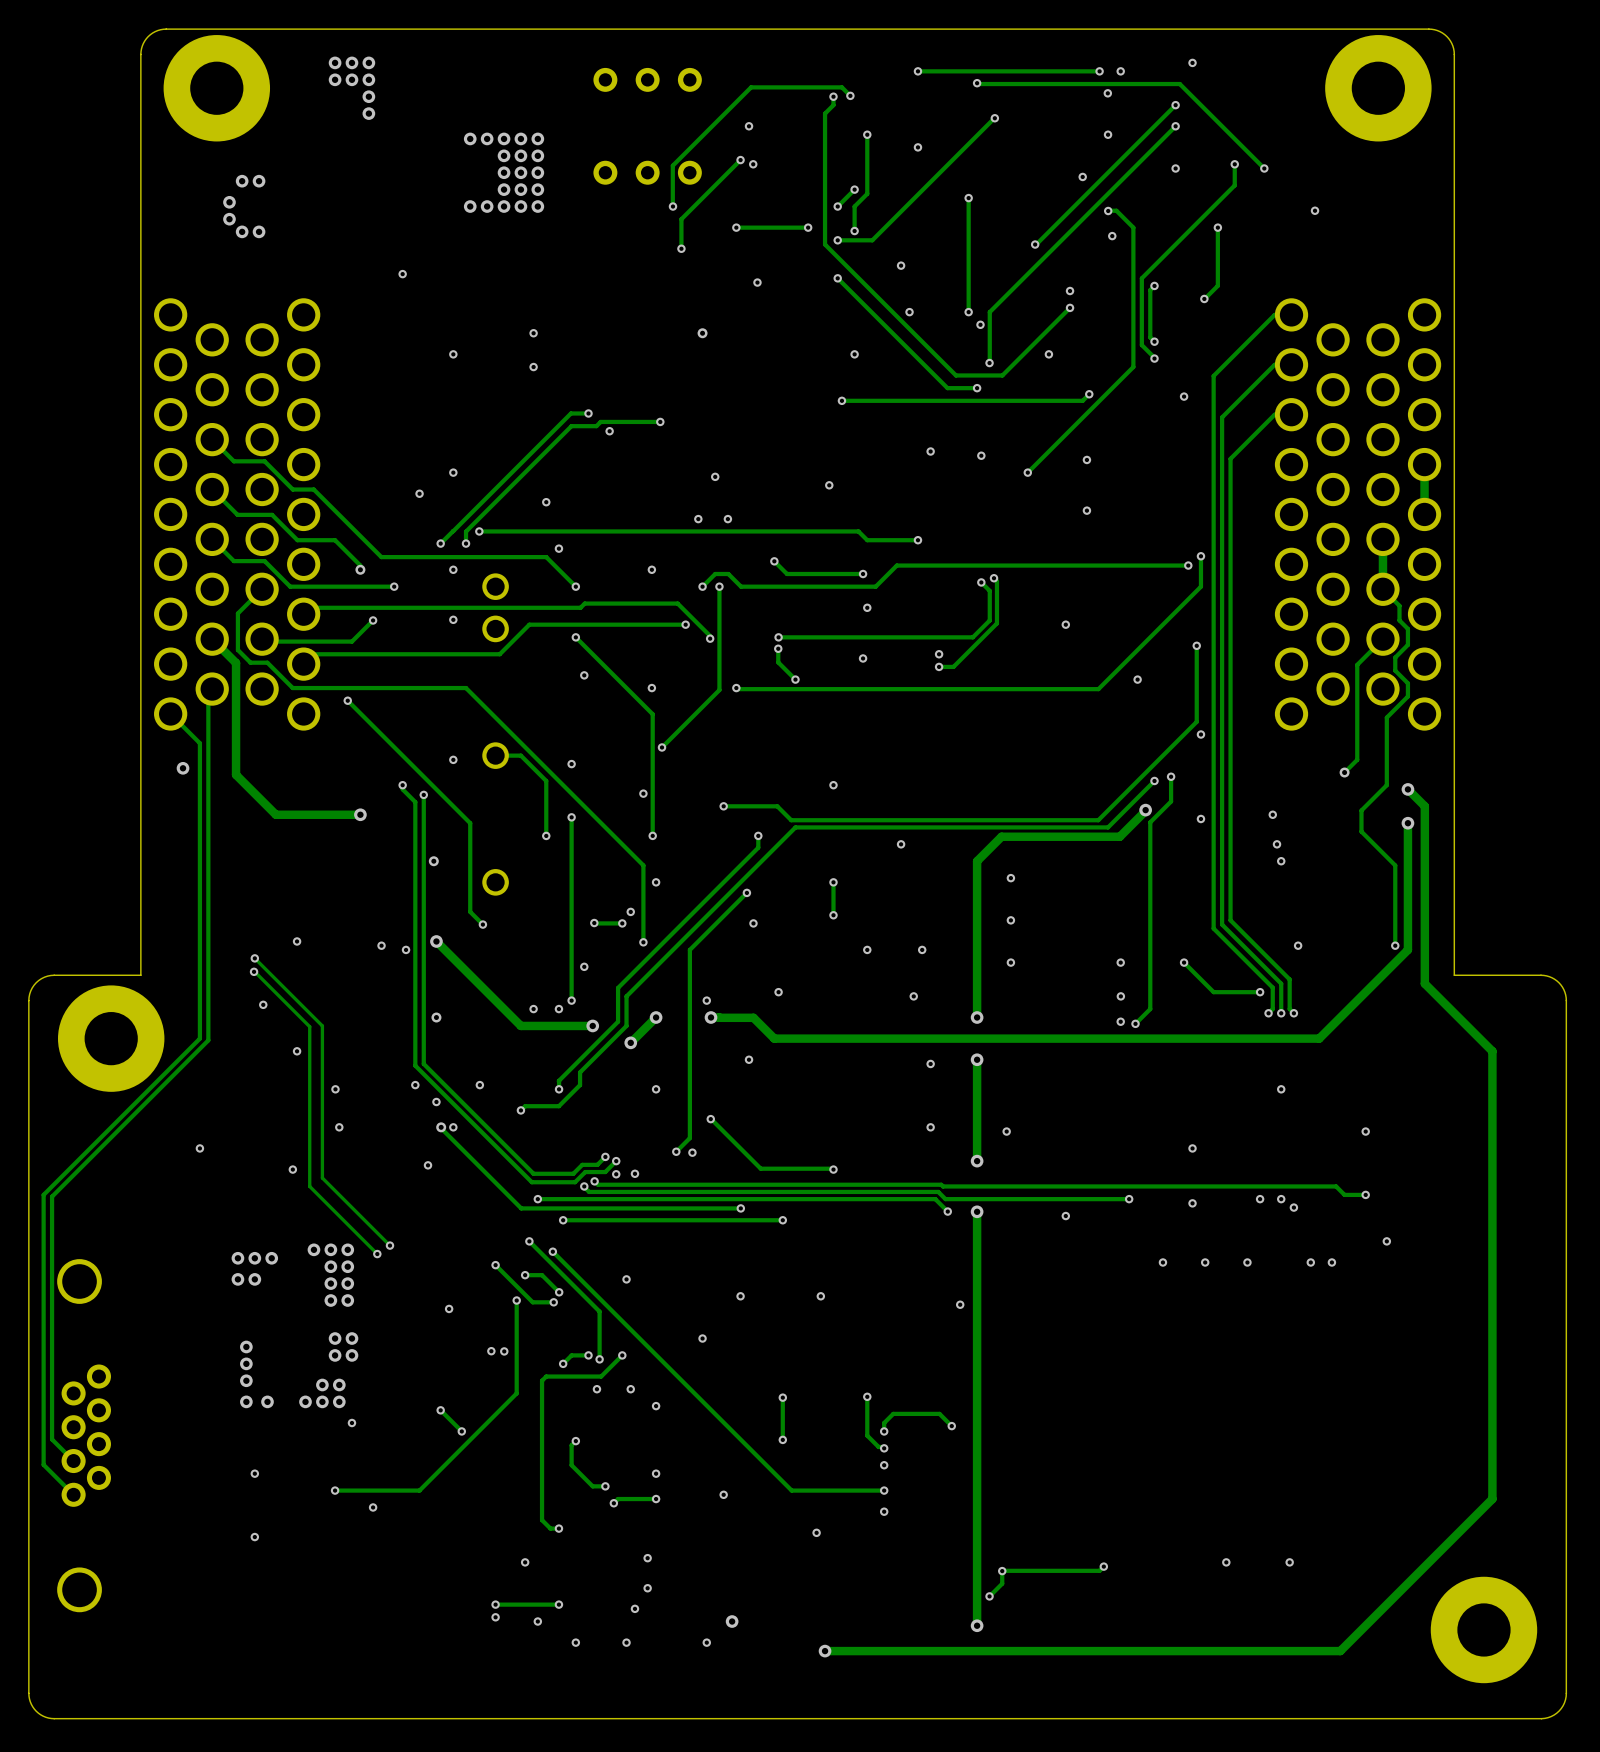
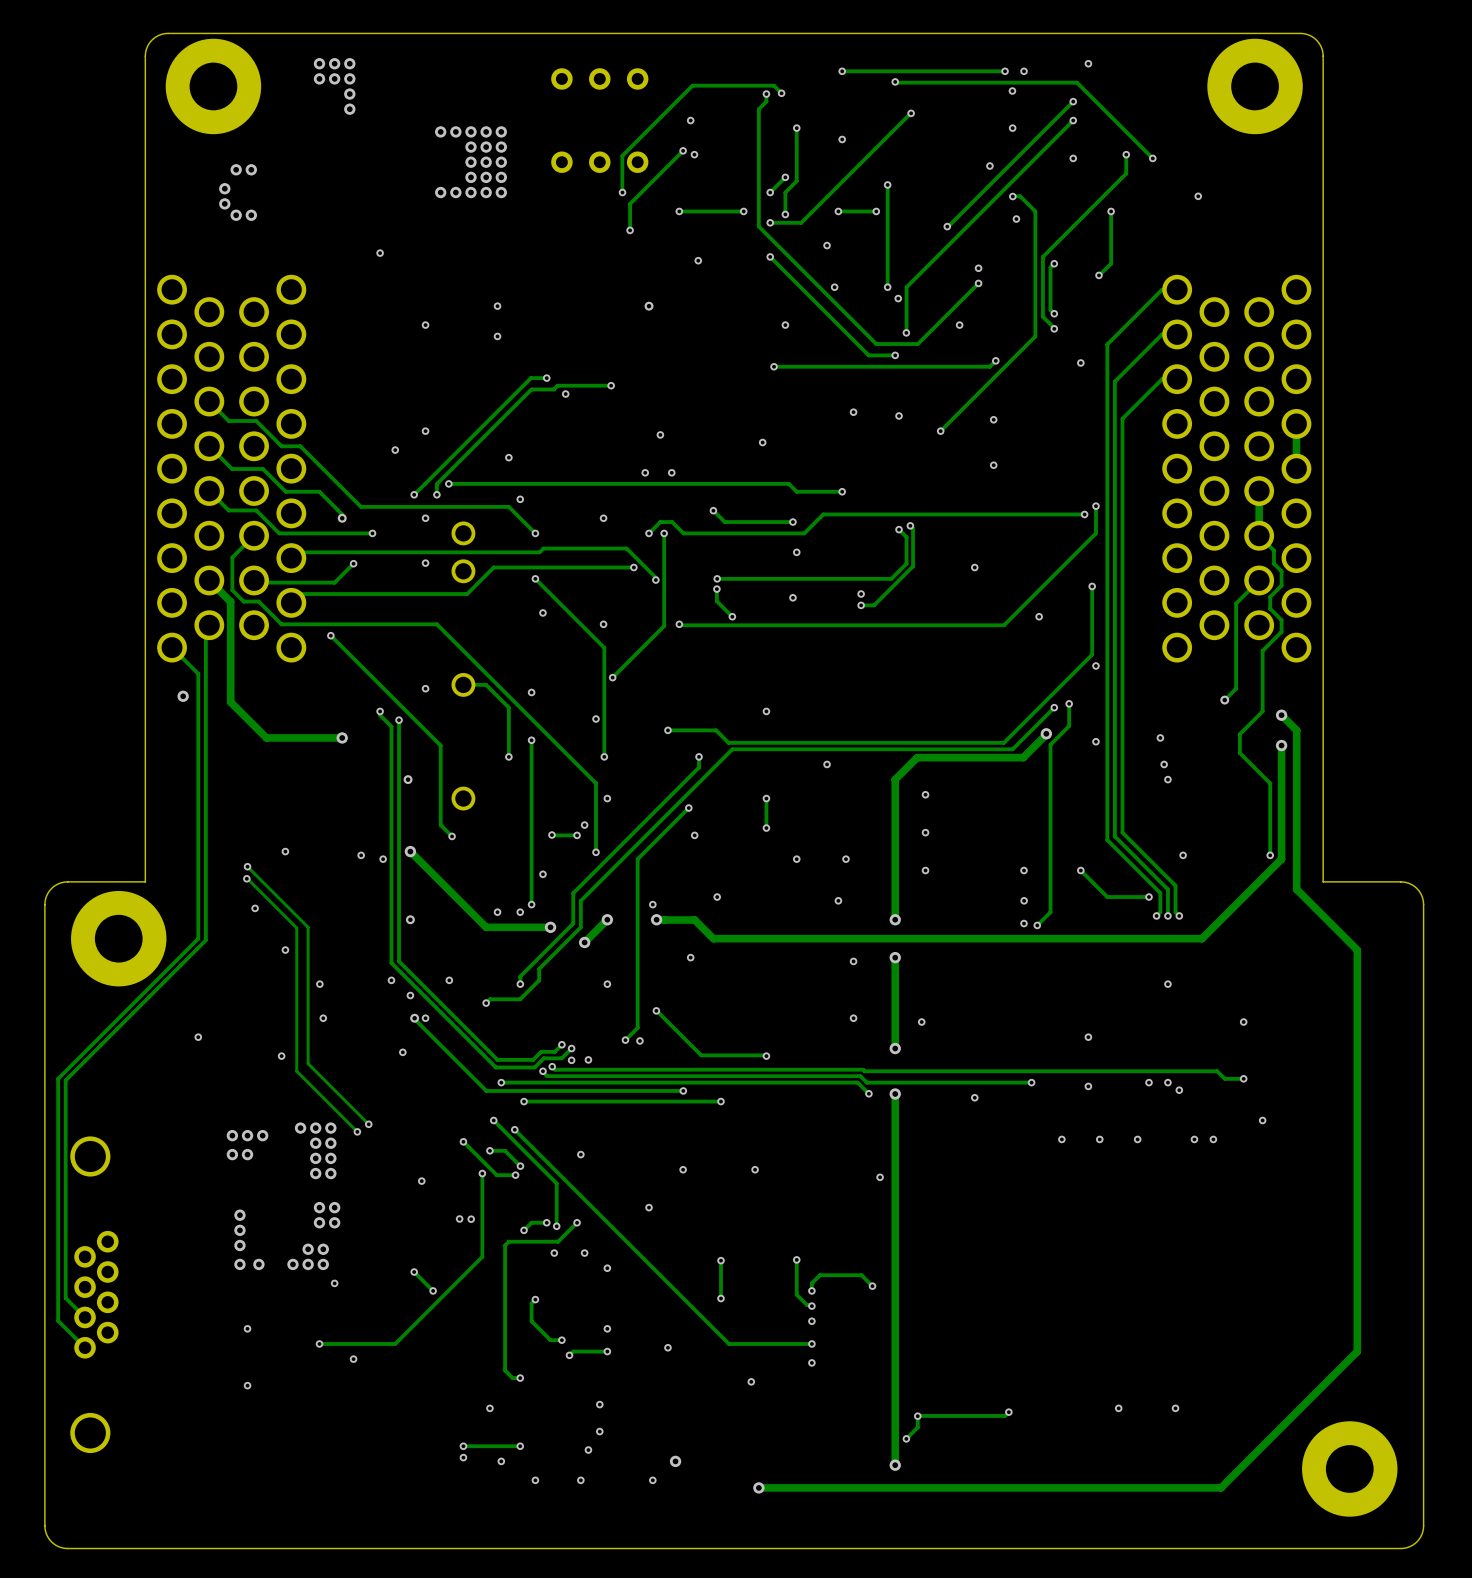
via: none -> (838, 211)
track: none -> (876, 211) (838, 211)
via: none -> (876, 211)

